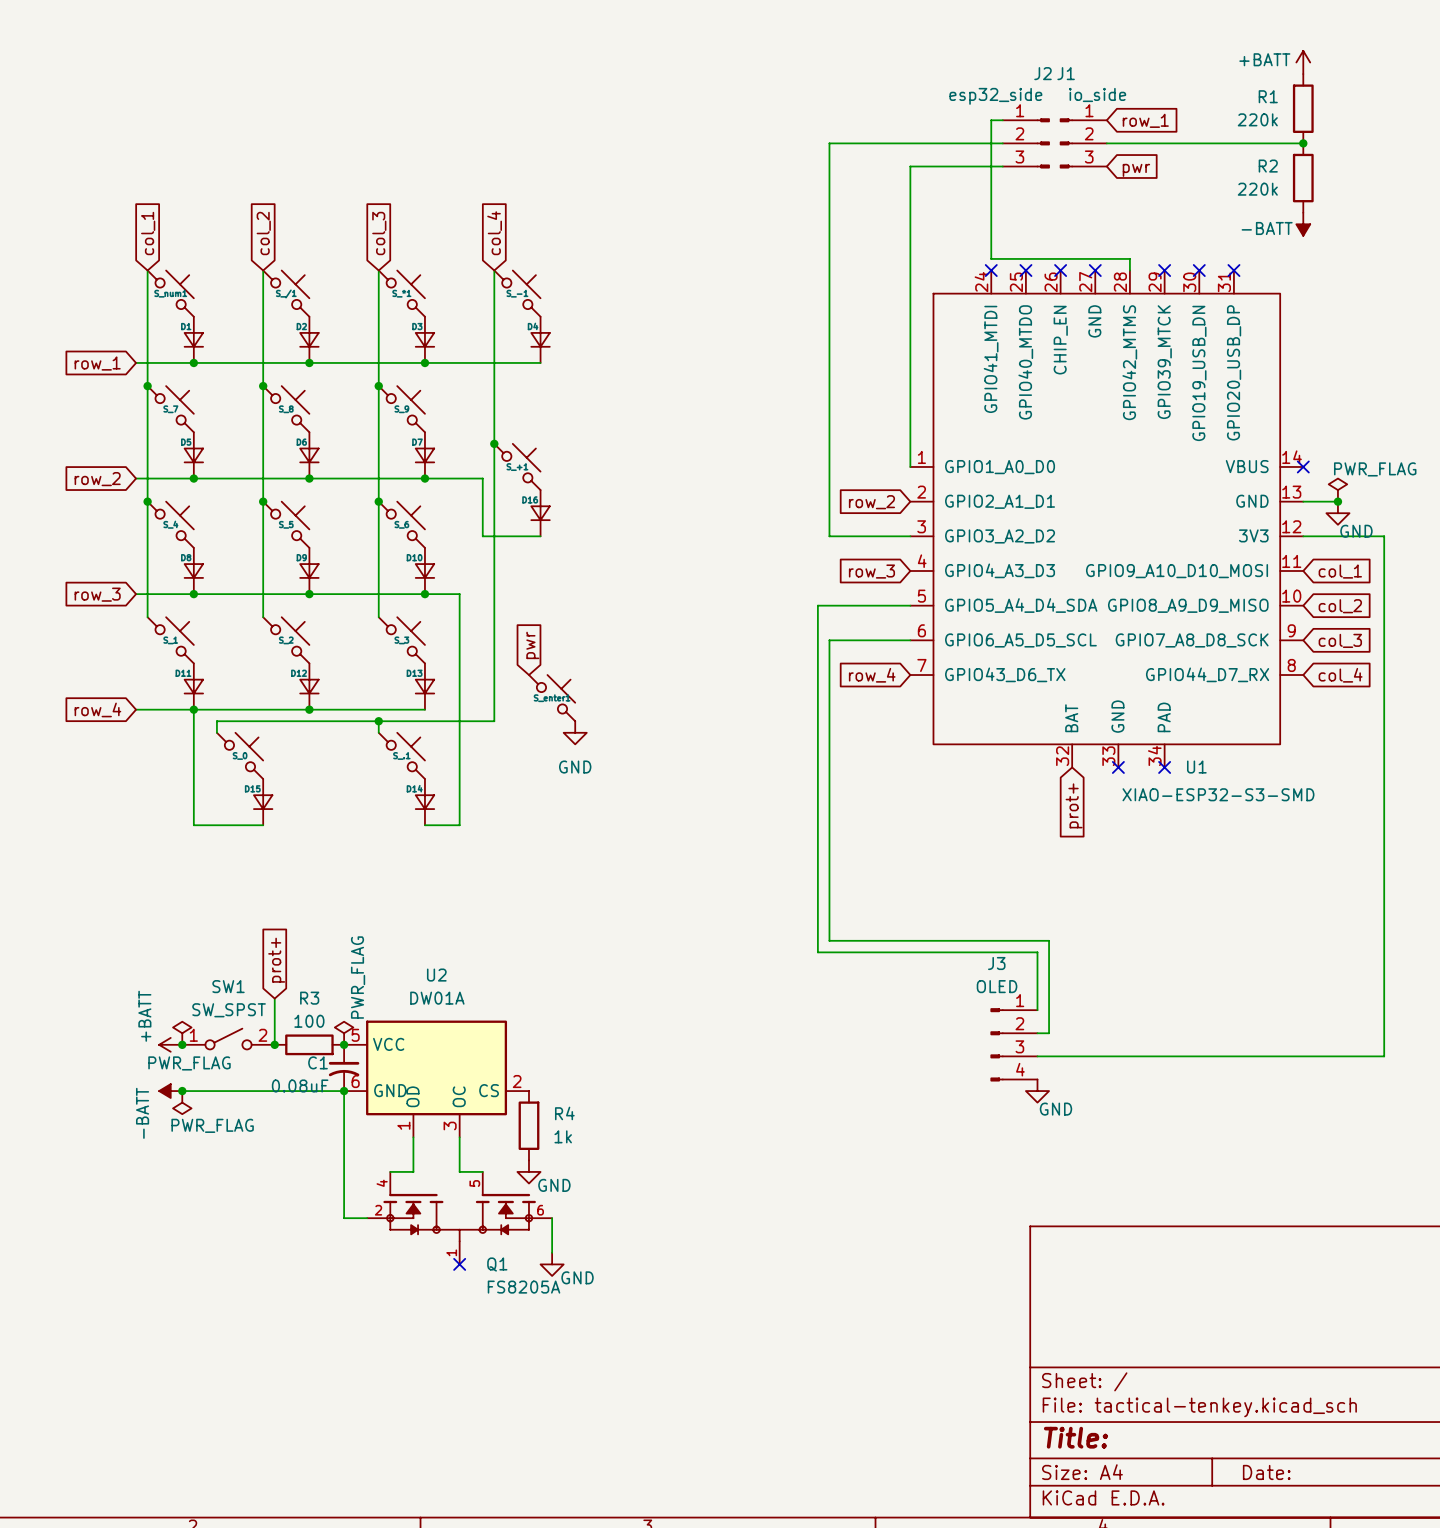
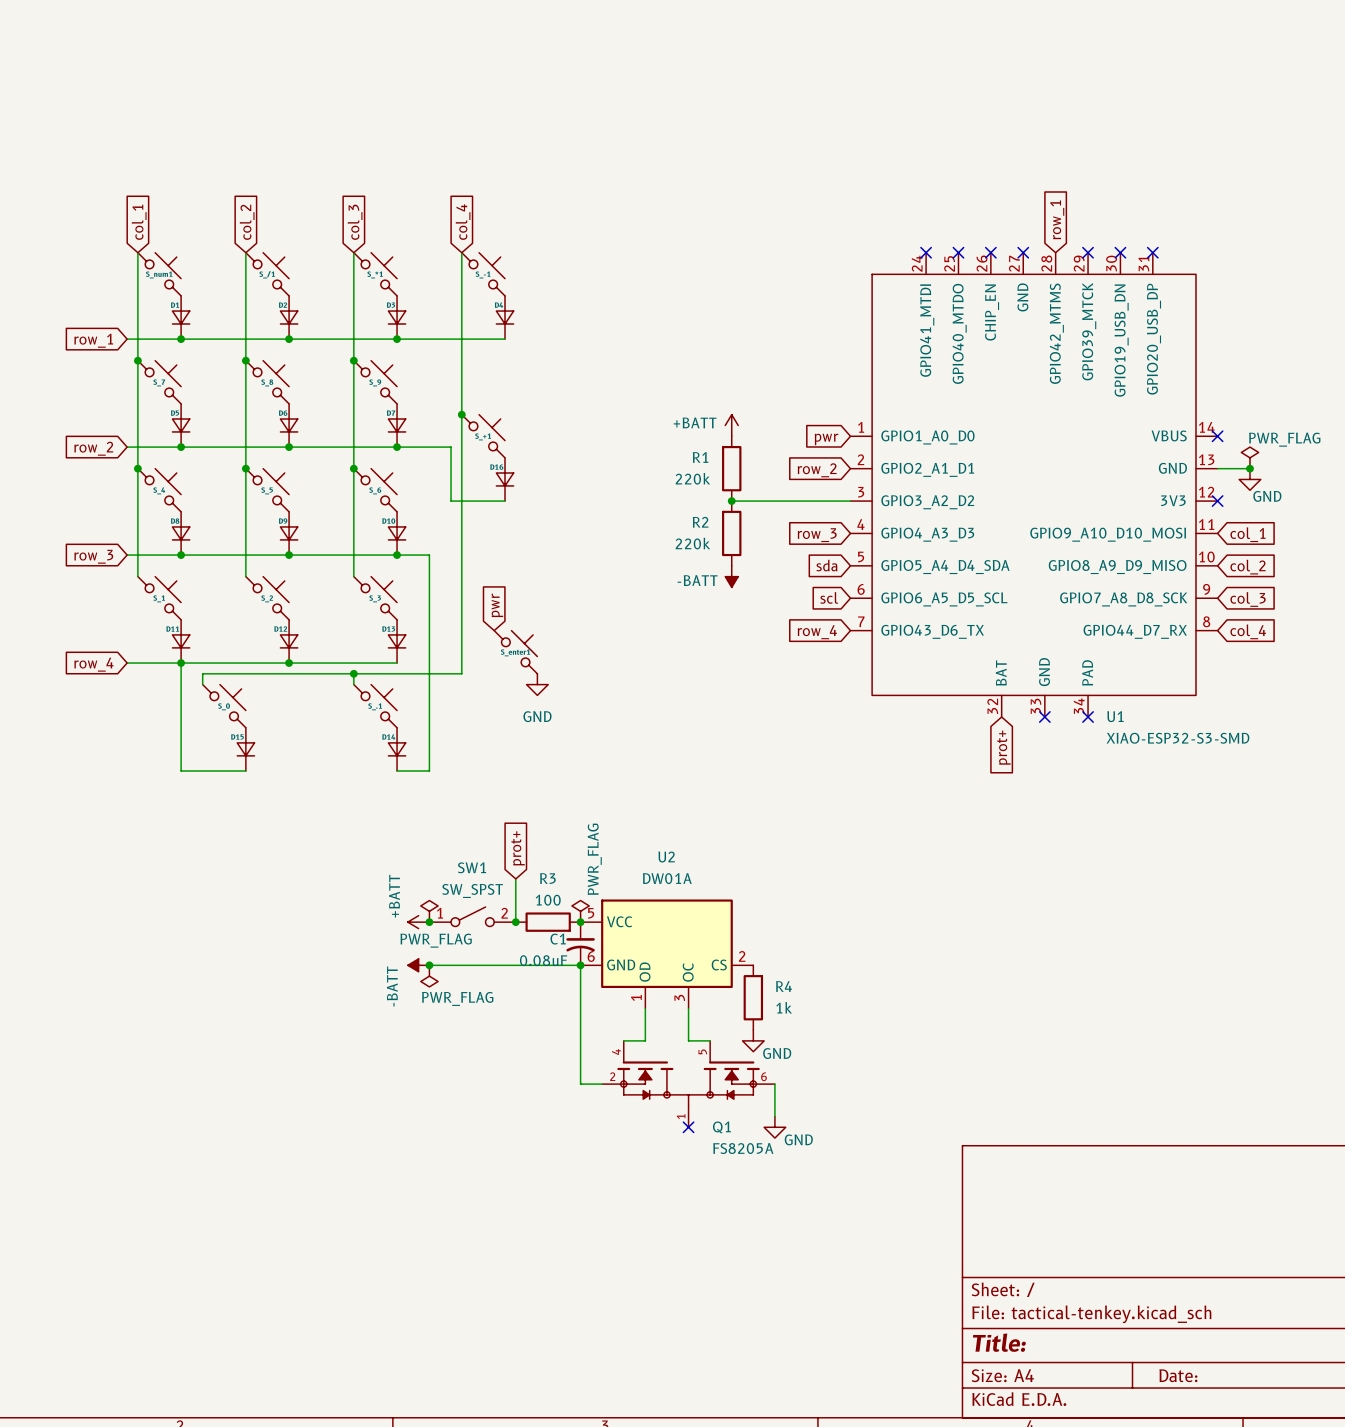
power symbol: +BATT (1303, 62) -> none
R1 position: (1303, 108) -> (731, 468)
wire: (1002, 120) (991, 120) (991, 258) (1129, 258) (1129, 270) -> none
global label rotation: 0° (1145, 120) -> 90° counterclockwise (1057, 219)
global label position: row_1 (1145, 120) -> row_1 (1057, 219)
wire: (1002, 143) (829, 143) (829, 536) -> (731, 501) (774, 501)
J2: esp32_side (1026, 143) -> none
J1: io_side (1083, 143) -> none
wire: (1106, 143) (1303, 143) -> none
junction: (1303, 143) -> none
wire: (1002, 166) (910, 166) (910, 466) -> none
global label: pwr (1136, 170) -> none
R2 position: (1303, 178) -> (731, 533)
power symbol: -BATT (1303, 224) -> none
power symbol: none -> +BATT (731, 425)
global label: none -> pwr (826, 439)
junction: none -> (731, 501)
wire: (1303, 536) (1384, 536) (1384, 1056) (1037, 1056) -> none
no-connect mark: none -> (1217, 501)
global label: none -> sda (826, 565)
wire: (910, 605) (817, 605) (817, 952) (1037, 952) (1037, 1010) -> none
power symbol: none -> -BATT (731, 576)
global label: none -> scl (829, 597)
wire: (910, 640) (829, 640) (829, 940) (1049, 940) (1049, 1033) (1037, 1033) -> none
U1 value position: XIAO-ESP32-S3-SMD (1218, 794) -> XIAO-ESP32-S3-SMD (1177, 738)
global label: none -> prot+ (517, 848)
wire: none -> (515, 878) (515, 922)
global label: prot+ (276, 960) -> none
power symbol: none -> PWR_FLAG (429, 911)
power symbol: none -> PWR_FLAG (580, 911)
power symbol: none -> +BATT (418, 922)
junction: none -> (429, 922)
junction: none -> (515, 922)
junction: none -> (580, 922)
wire: (274, 998) (274, 1044) -> none
power symbol: PWR_FLAG (182, 1033) -> none
power symbol: PWR_FLAG (344, 1033) -> none
power symbol: none -> -BATT (418, 965)
wire: none -> (429, 965) (580, 965) (580, 1084) (602, 1084)
junction: none -> (429, 965)
junction: none -> (580, 965)
SW1 position: (228, 1039) -> (472, 916)
power symbol: +BATT (170, 1044) -> none
junction: (182, 1044) -> none
junction: (274, 1044) -> none
R3 position: (309, 1044) -> (548, 922)
junction: (344, 1044) -> none
power symbol: none -> PWR_FLAG (429, 976)
J3: OLED (1014, 1044) -> none
C1 position: (344, 1067) -> (580, 943)
U2 position: (436, 1078) -> (666, 953)
wire: none -> (645, 1008) (645, 1040) (623, 1040)
wire: none -> (688, 1008) (688, 1040) (710, 1040)
power symbol: -BATT (170, 1091) -> none
wire: (182, 1091) (344, 1091) (344, 1218) (367, 1218) -> none
junction: (182, 1091) -> none
junction: (344, 1091) -> none
power symbol: GND (1037, 1091) -> none
power symbol: PWR_FLAG (182, 1102) -> none
power symbol: none -> GND (753, 1040)
R4 position: (528, 1125) -> (753, 997)
wire: (413, 1137) (413, 1171) (390, 1171) -> none
wire: (459, 1137) (459, 1171) (482, 1171) -> none
wire: none -> (774, 1084) (774, 1116)
power symbol: GND (528, 1171) -> none
no-connect mark: none -> (688, 1127)
power symbol: none -> GND (774, 1127)
Q1 position: (459, 1218) -> (688, 1084)
wire: (552, 1218) (552, 1252) -> none
no-connect mark: (459, 1264) -> none
power symbol: GND (552, 1264) -> none

